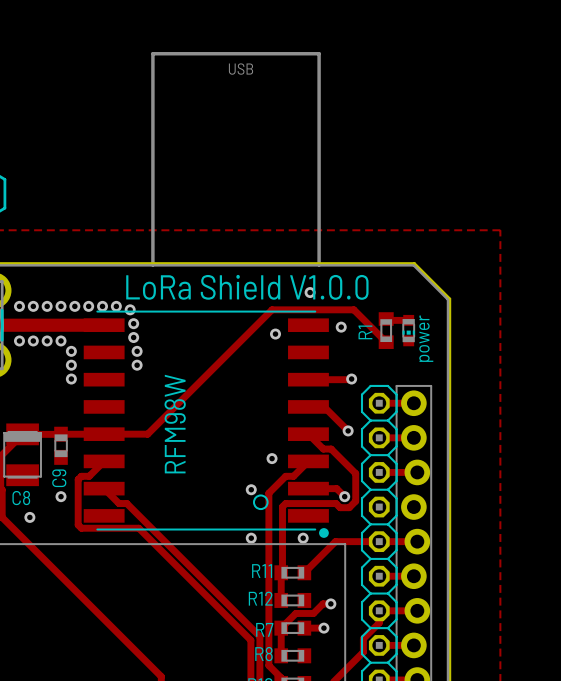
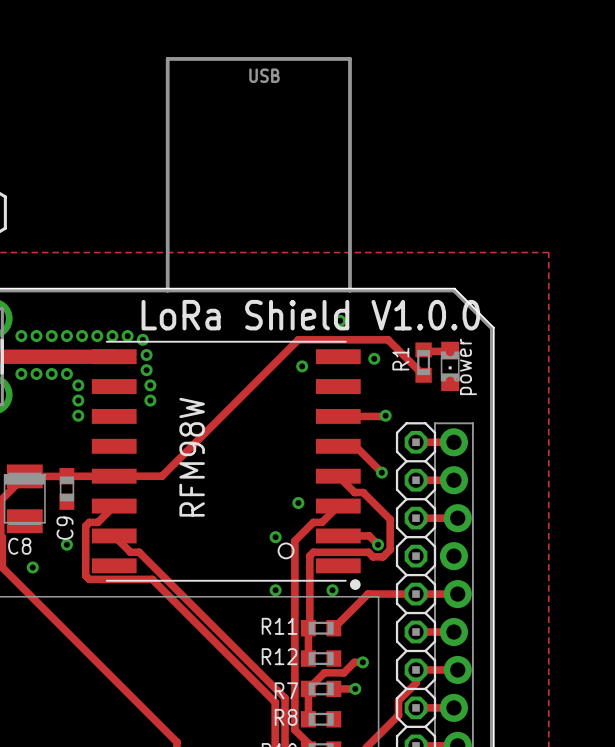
part footprint: [402, 314, 415, 347] -> [440, 341, 460, 392]

